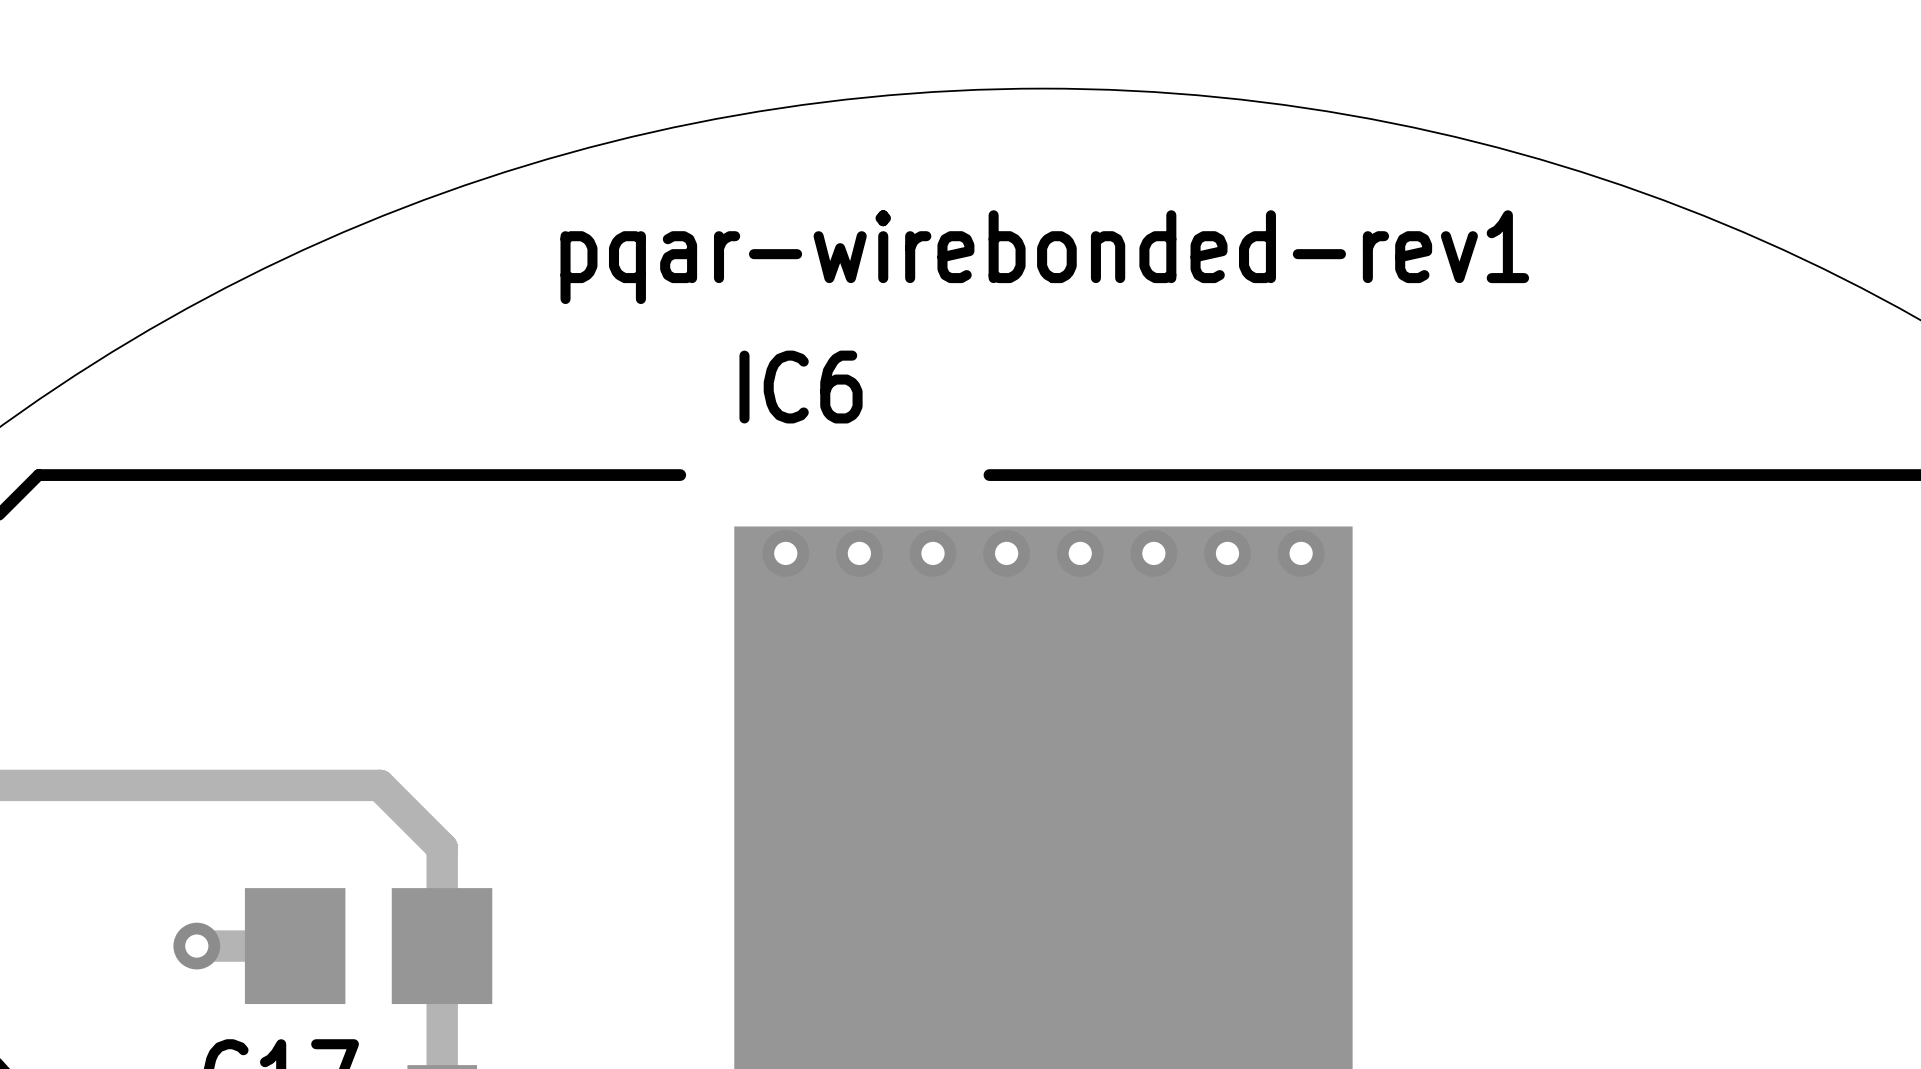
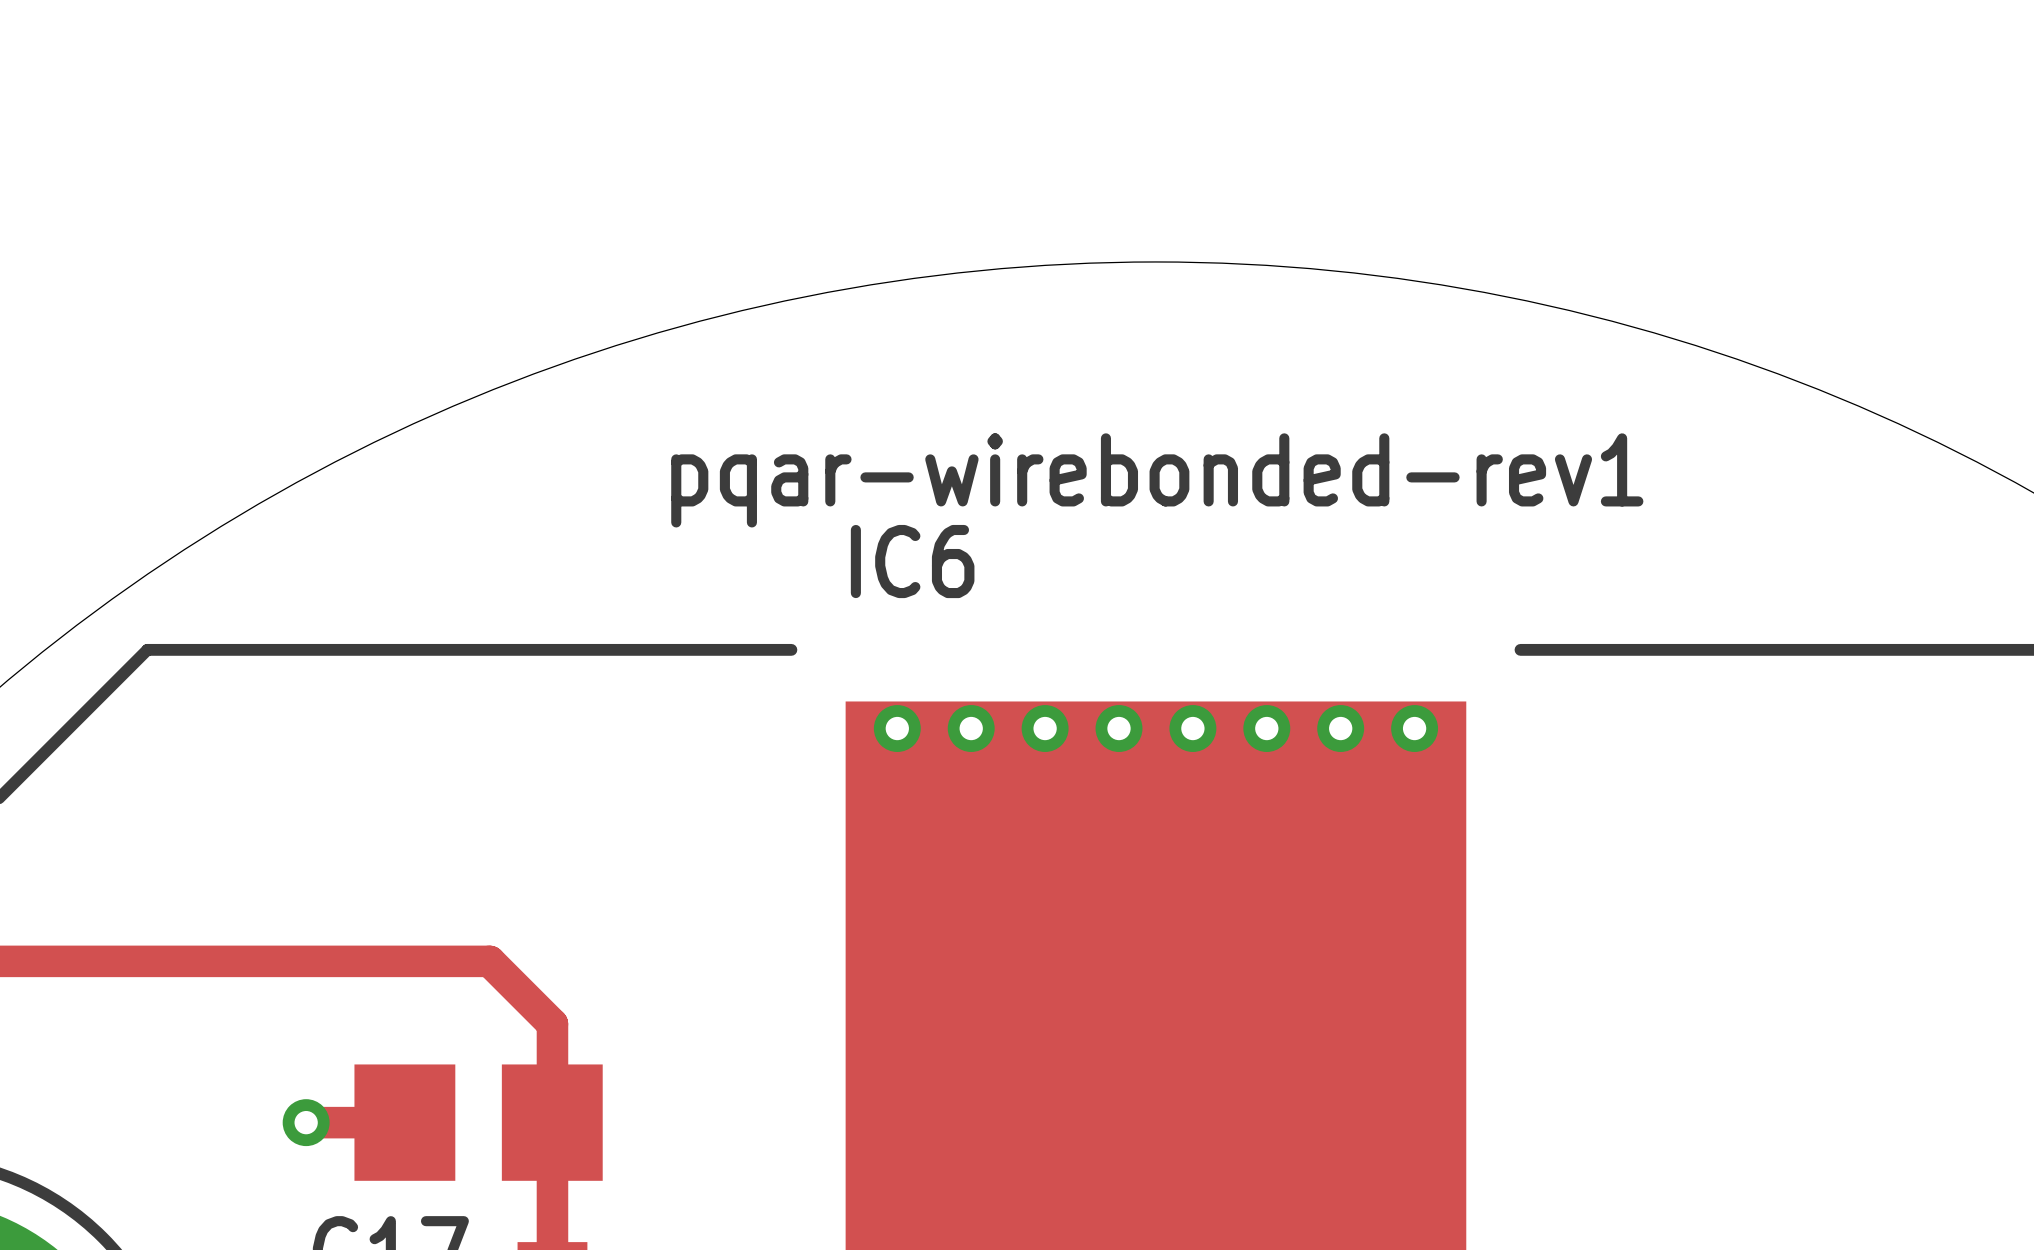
text position: pqar-wirebonded-rev1 (1044, 257) -> pqar-wirebonded-rev1 (1157, 480)
line: (989, 475) (1406, 475) -> none

